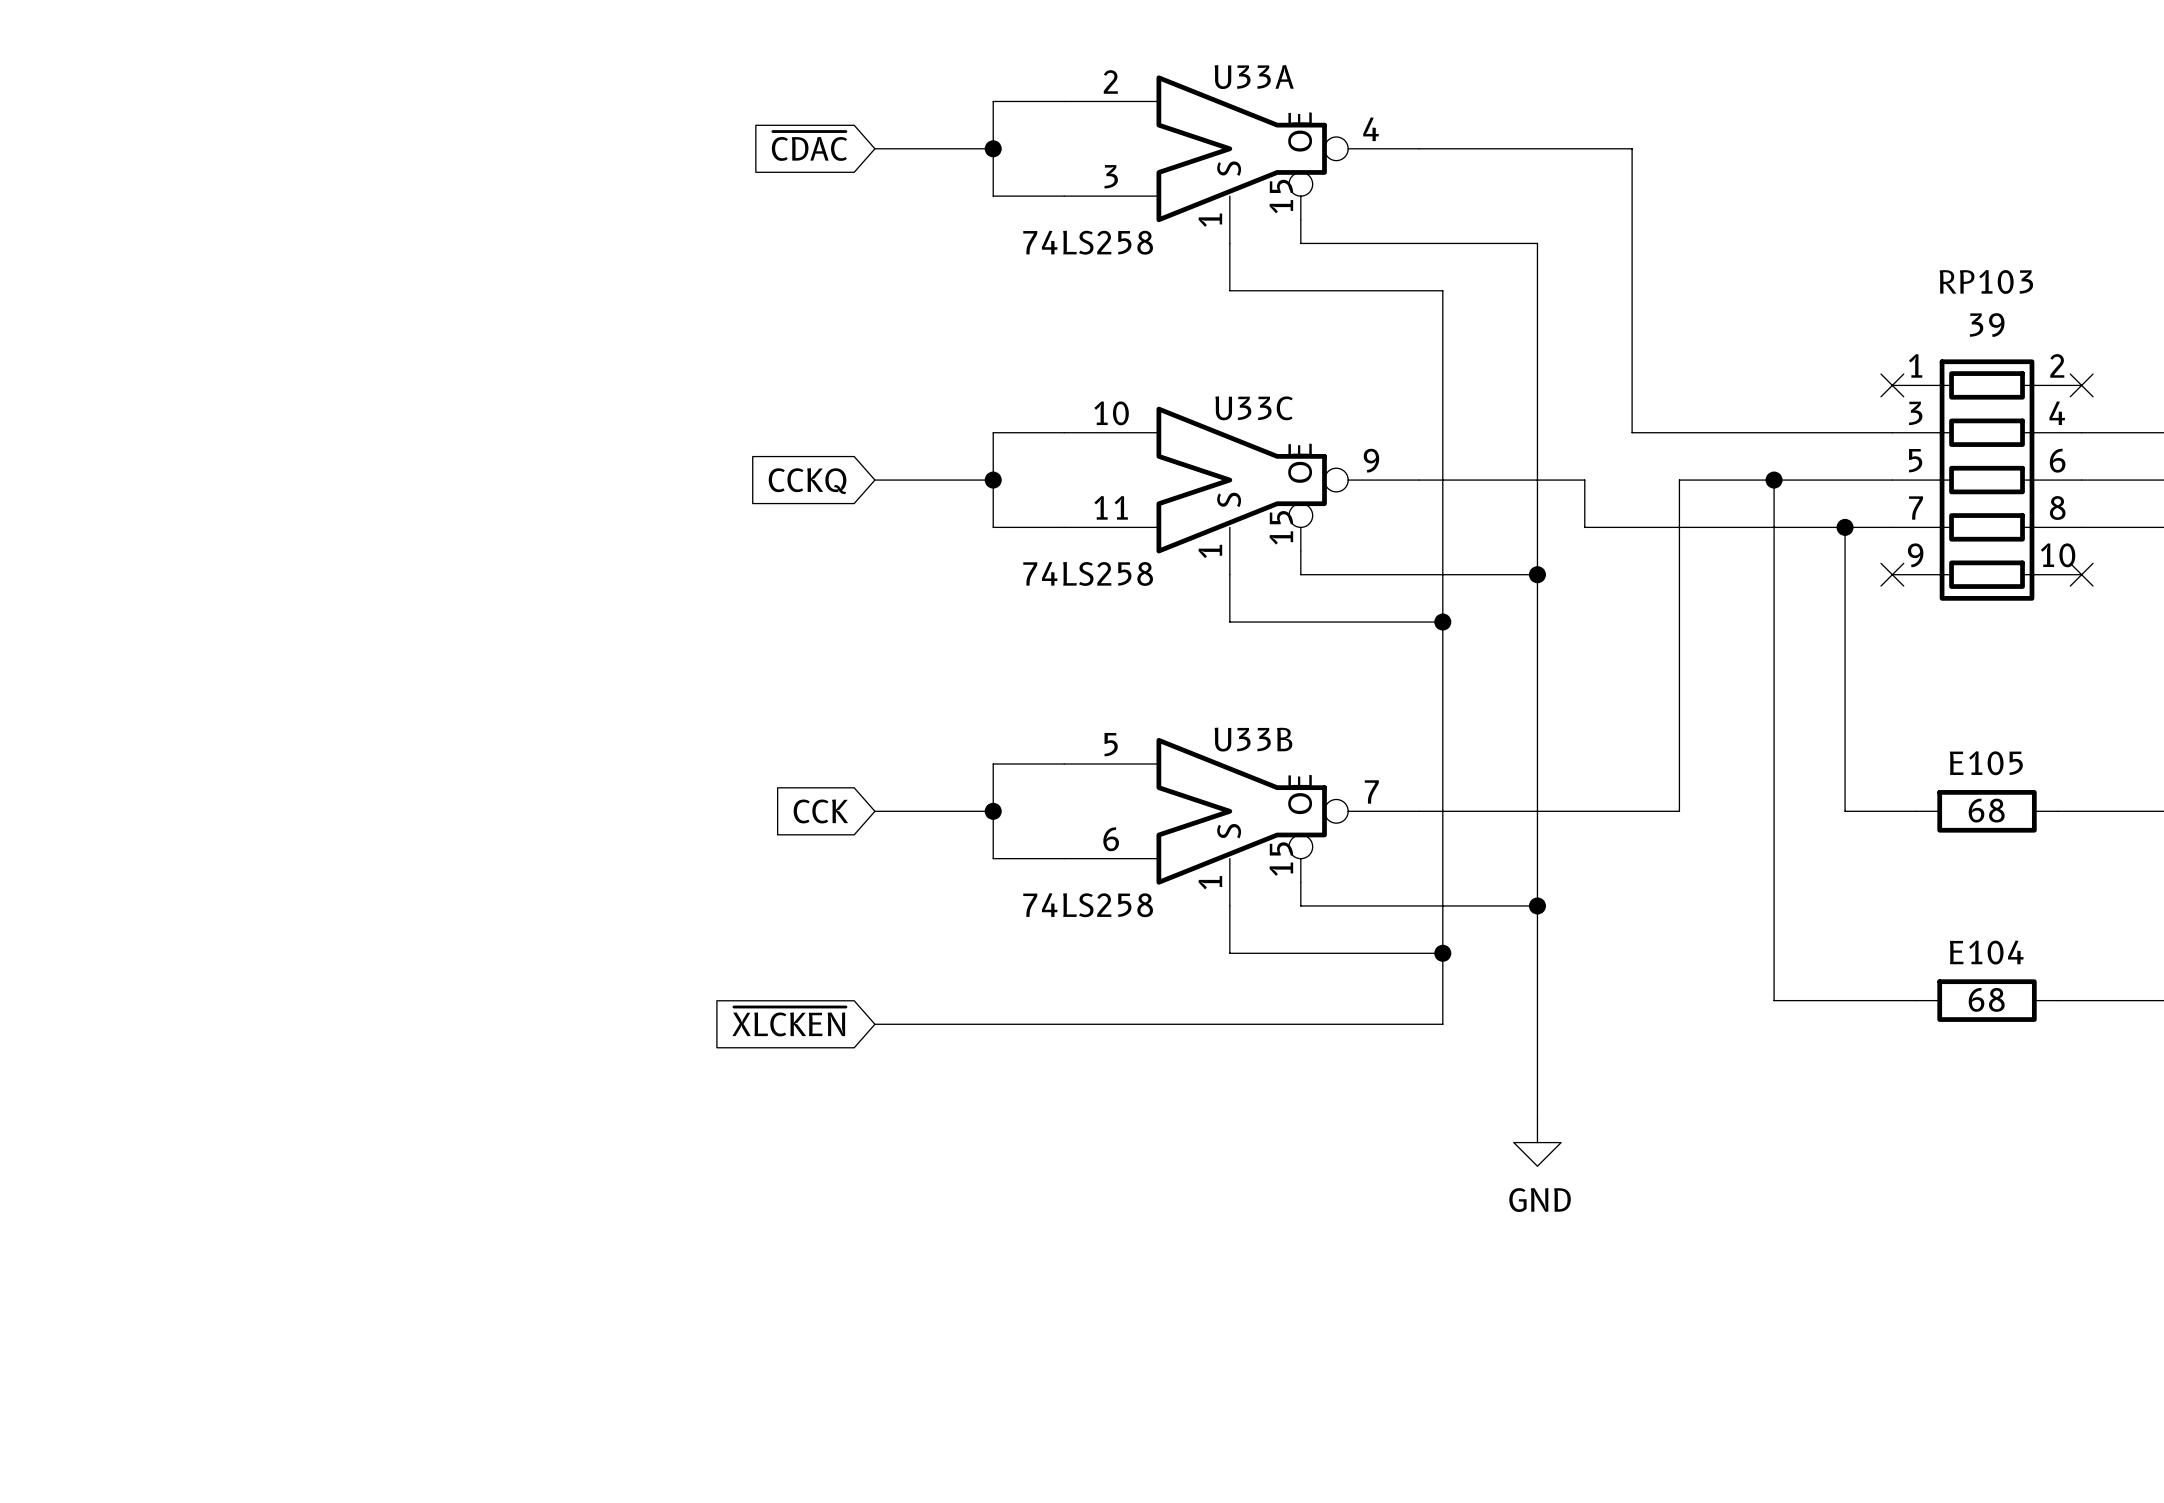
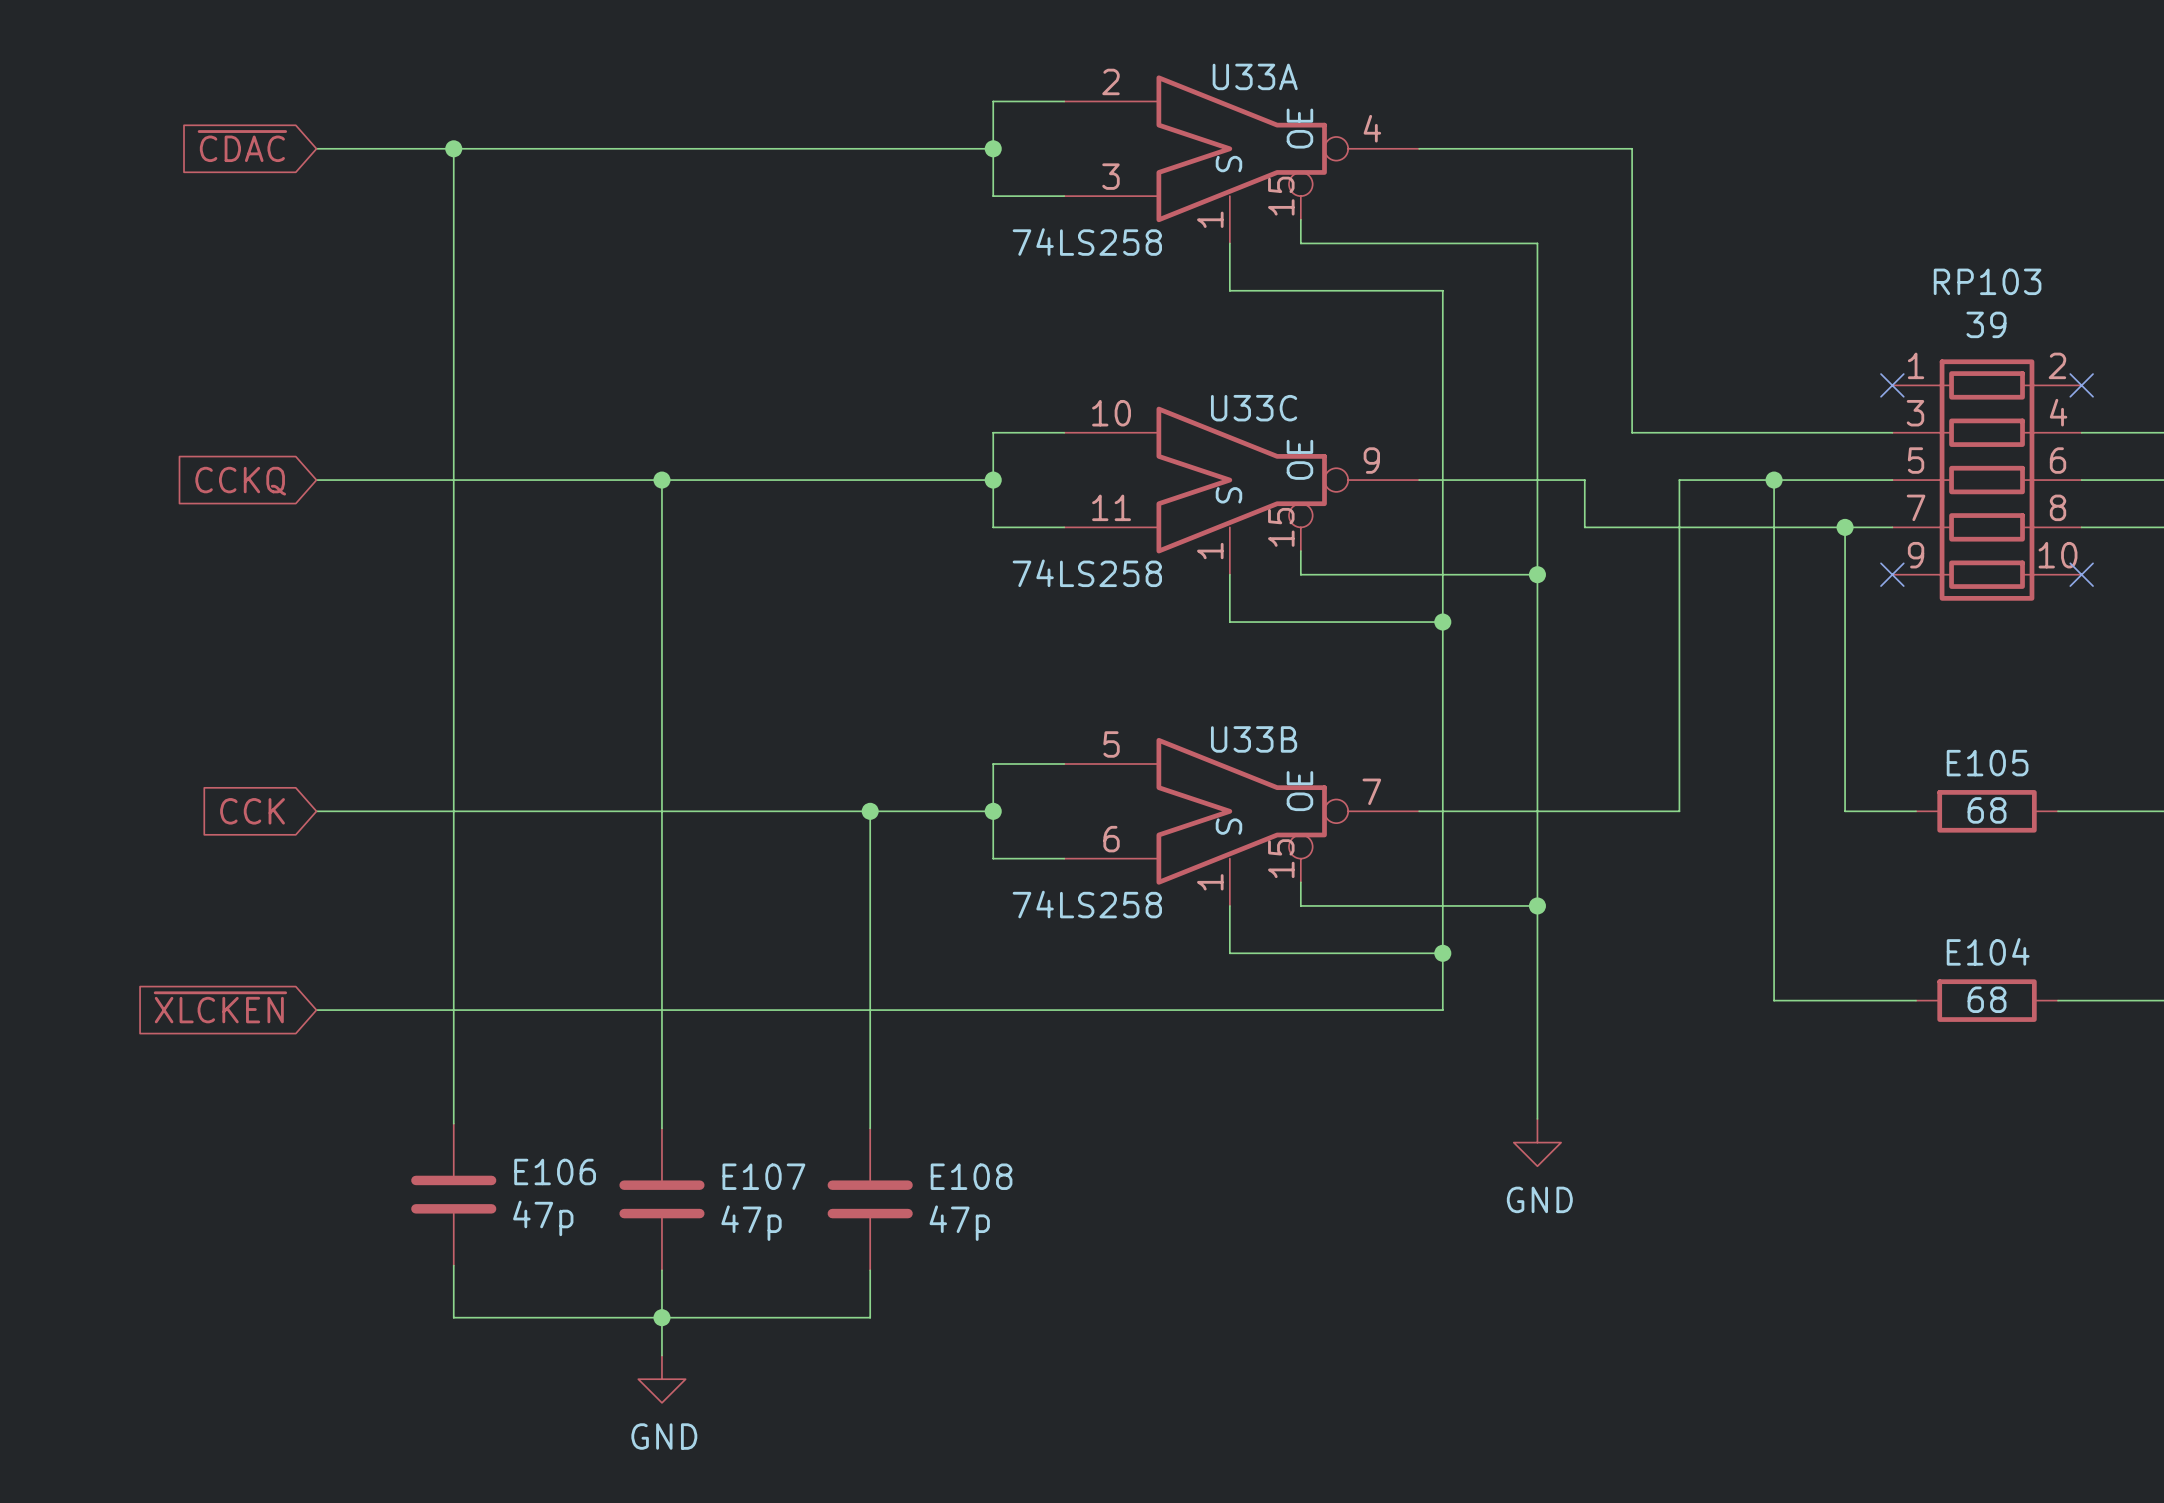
global label: none -> ~{CDAC} (242, 146)
global label: ~{CDAC} (809, 146) -> none
wire: none -> (316, 148) (874, 148)
wire: none -> (453, 148) (453, 1123)
junction: none -> (453, 148)
wire: none -> (316, 480) (874, 480)
wire: none -> (661, 480) (661, 1128)
junction: none -> (661, 480)
global label: none -> CCKQ (240, 481)
global label: CCKQ (807, 481) -> none
global label: none -> CCK (252, 811)
wire: none -> (316, 811) (874, 811)
global label: CCK (820, 811) -> none
wire: none -> (870, 811) (870, 1128)
junction: none -> (870, 811)
global label: none -> ~{XLCKEN} (220, 1007)
wire: (1442, 1010) (1442, 1024) (874, 1024) -> (1442, 1010) (316, 1010)
global label: ~{XLCKEN} (789, 1021) -> none
E106: none -> 47p (453, 1194)
E107: none -> 47p (661, 1199)
E108: none -> 47p (870, 1199)
wire: none -> (453, 1265) (453, 1317) (870, 1317) (870, 1270)
wire: none -> (661, 1270) (661, 1355)
junction: none -> (661, 1317)
power symbol: none -> GND (661, 1379)

